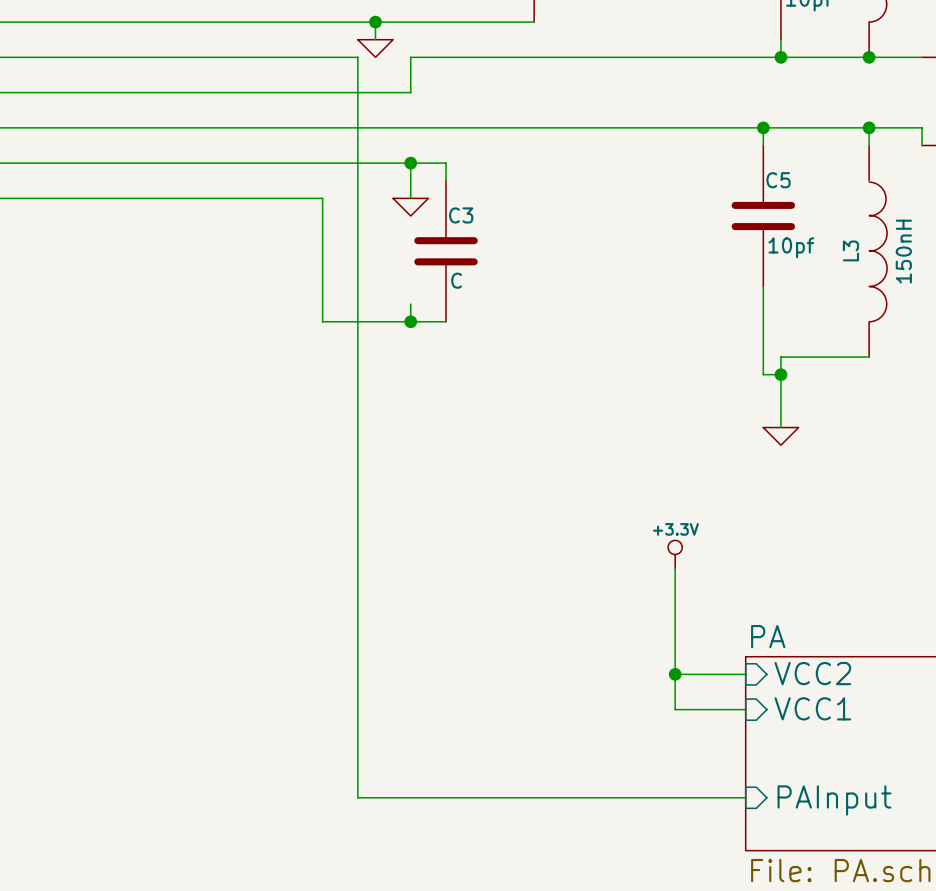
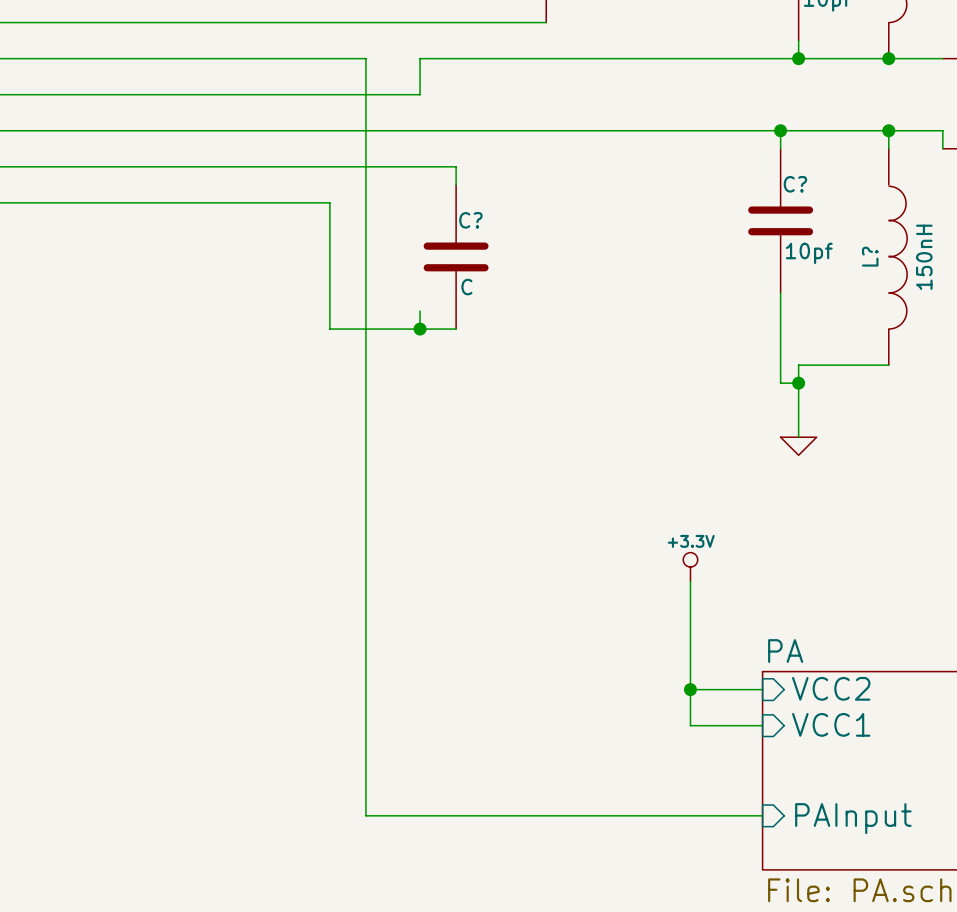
wire: (375, 22) (375, 39) -> none
junction: (375, 22) -> none
power symbol: (375, 48) -> none
wire: (410, 163) (410, 198) -> none
junction: (410, 163) -> none
C5 name: C5 (778, 180) -> C? (795, 184)
power symbol: (410, 207) -> none
C3 name: C3 (461, 215) -> C? (470, 220)
L3 name: L3 (850, 250) -> L? (870, 256)

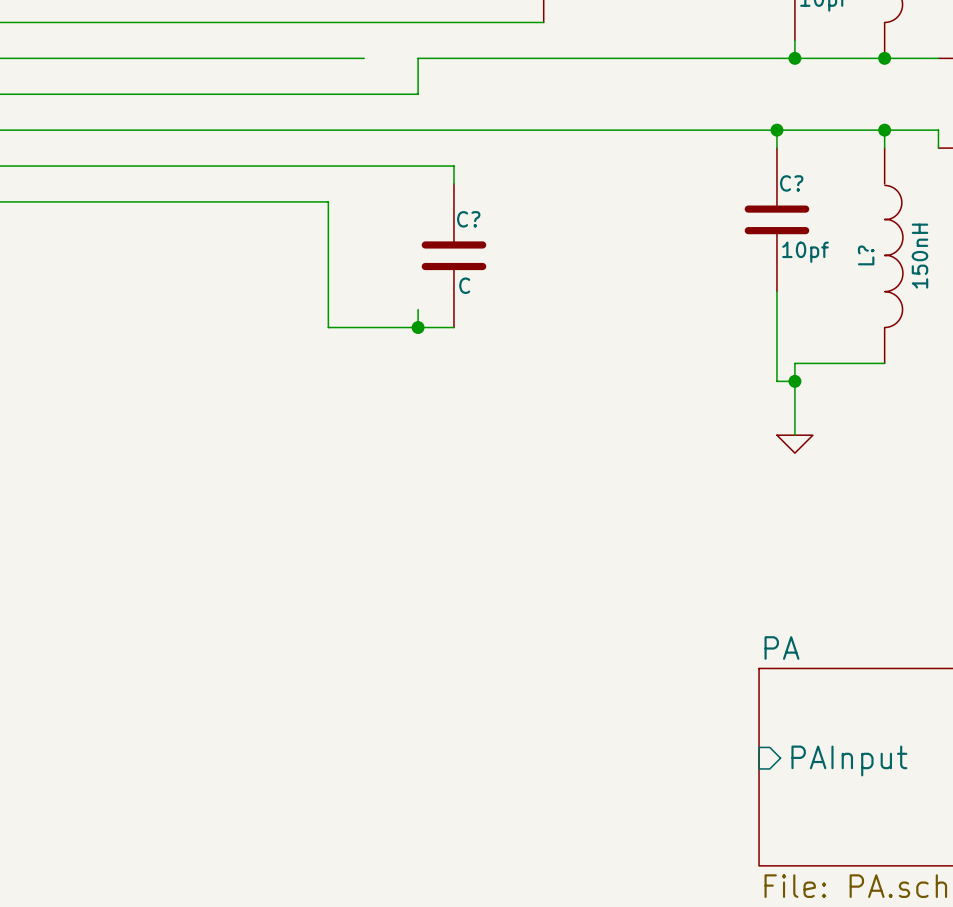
wire: (365, 58) (365, 815) (762, 815) -> none
power symbol: +3.3V (690, 567) -> none
wire: (690, 581) (690, 725) (762, 725) -> none
sheet pin: VCC2 (831, 688) -> none
wire: (690, 689) (762, 689) -> none
junction: (690, 689) -> none
sheet pin: VCC1 (831, 724) -> none
sheet pin position: PAInput (853, 818) -> PAInput (849, 760)

